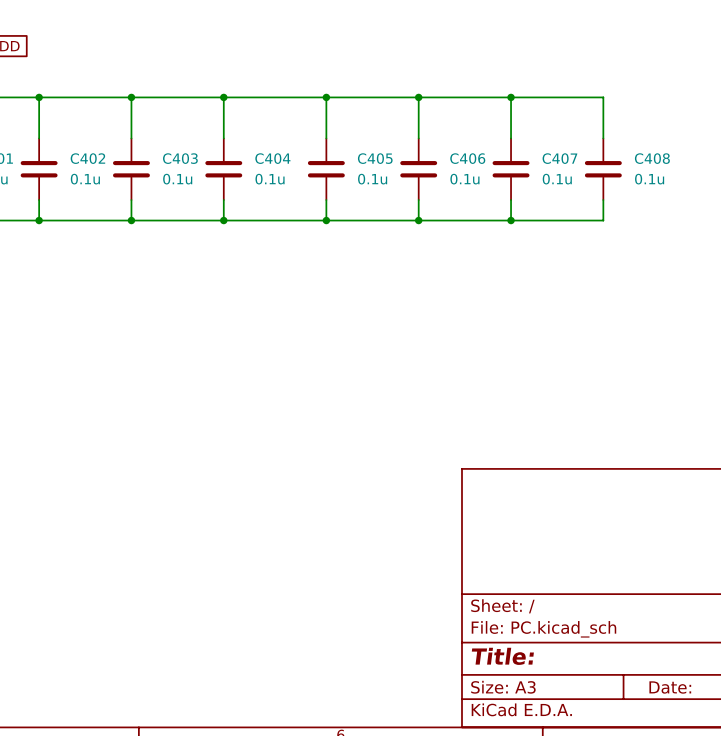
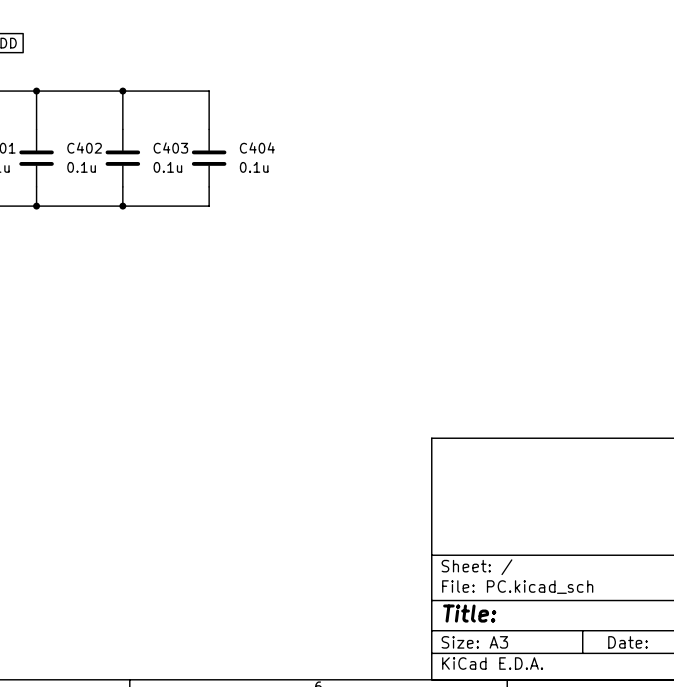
wire: (223, 97) (603, 97) (603, 138) -> none
junction: (223, 97) -> none
wire: (326, 97) (326, 138) -> none
junction: (326, 97) -> none
wire: (418, 97) (418, 138) -> none
junction: (418, 97) -> none
wire: (511, 97) (511, 138) -> none
junction: (511, 97) -> none
C405: 0.1u (326, 169) -> none
C406: 0.1u (418, 169) -> none
C407: 0.1u (511, 169) -> none
C408: 0.1u (603, 169) -> none
wire: (326, 200) (326, 220) -> none
wire: (418, 200) (418, 220) -> none
wire: (511, 200) (511, 220) -> none
wire: (603, 200) (603, 220) (223, 220) -> none
junction: (223, 220) -> none
junction: (326, 220) -> none
junction: (418, 220) -> none
junction: (511, 220) -> none

